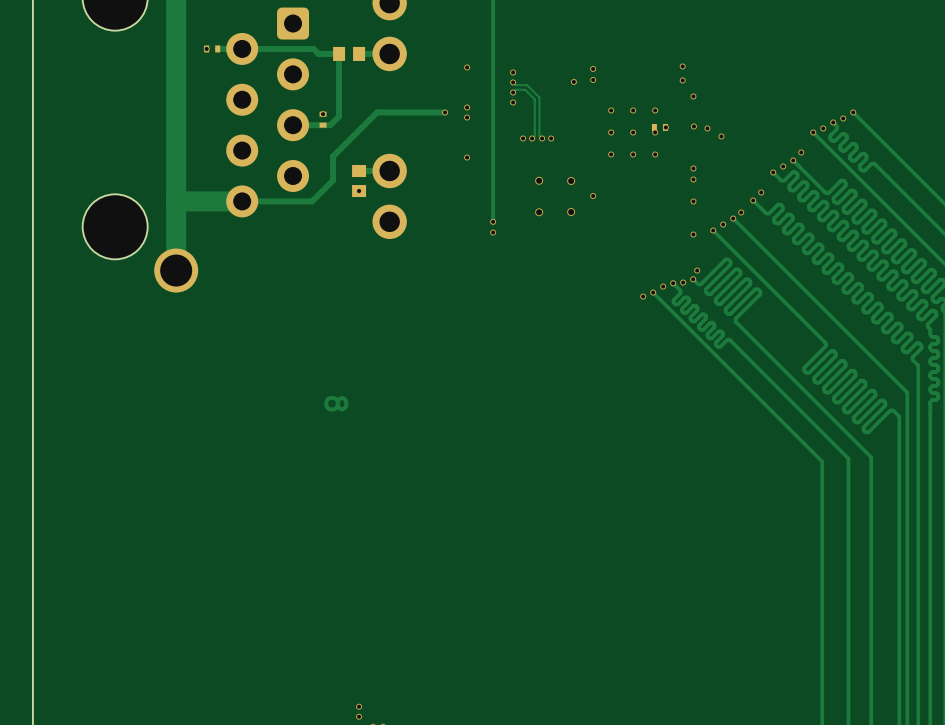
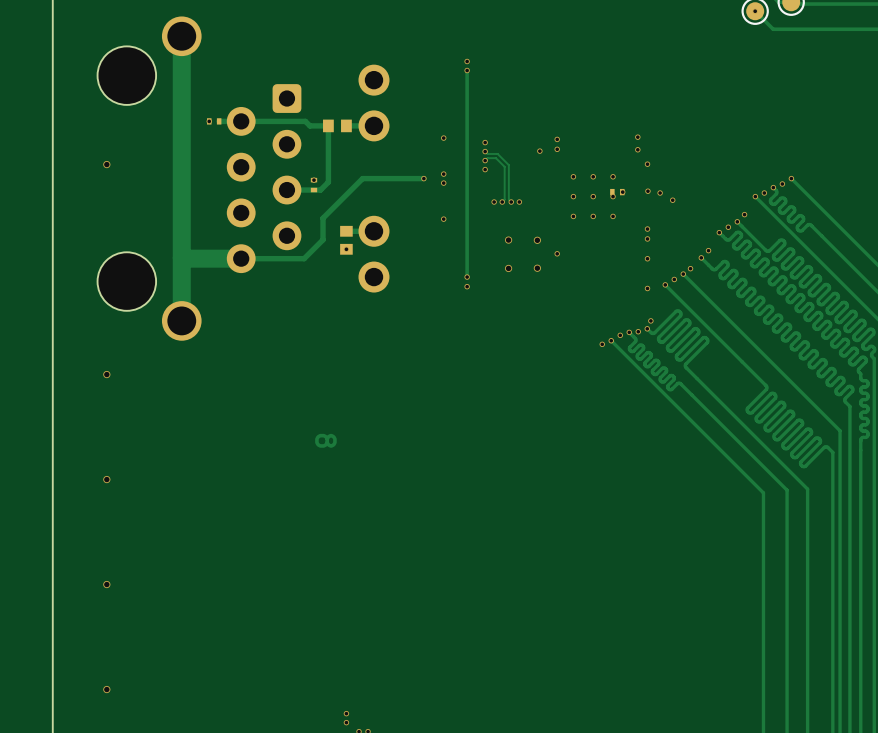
via: none -> (106, 164)
via: none -> (106, 374)
via: none -> (106, 479)
via: none -> (106, 584)
via: none -> (106, 689)

